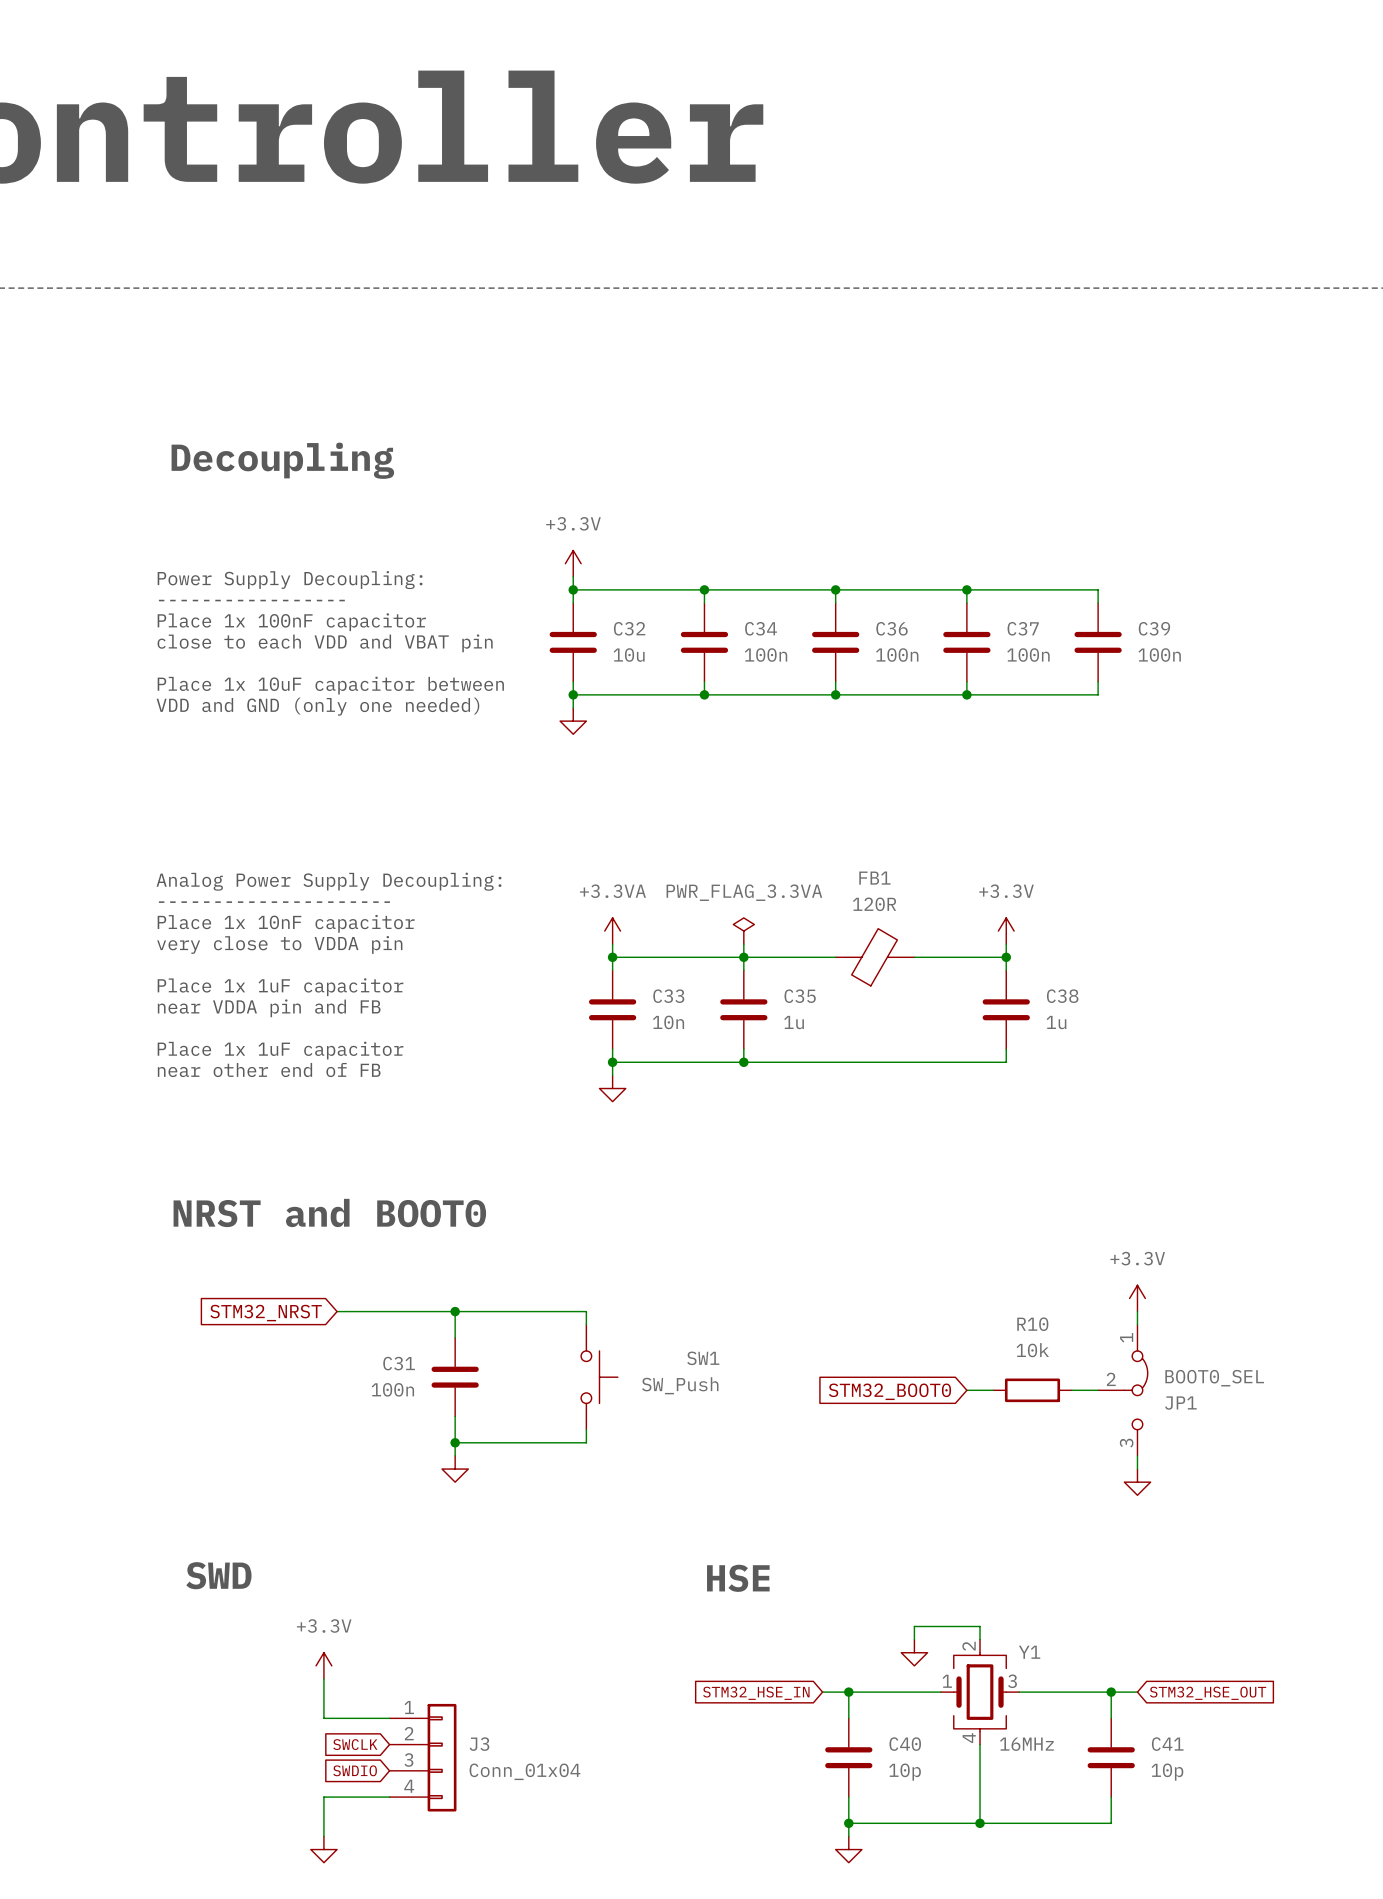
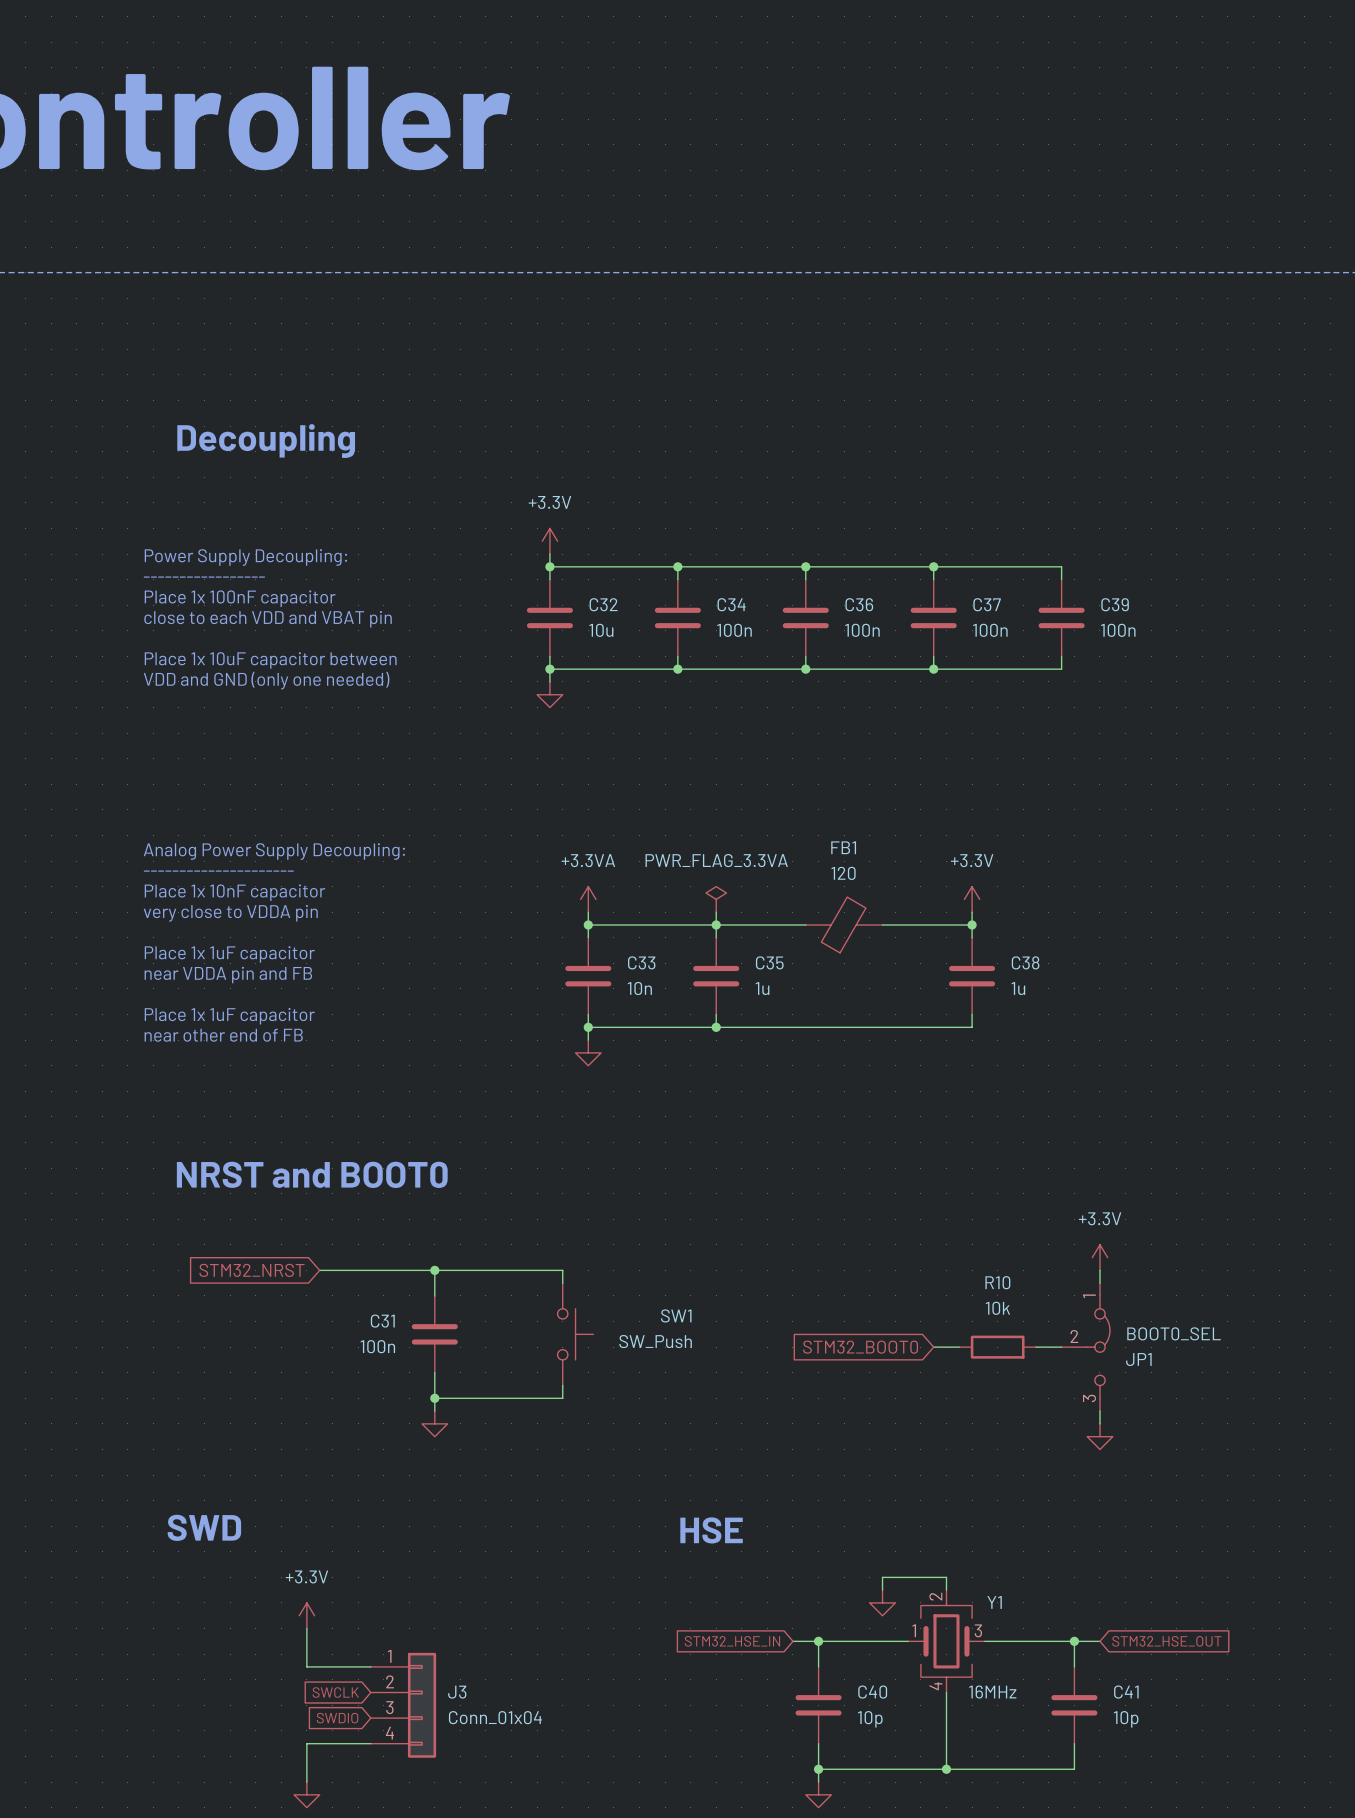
FB1 value: 120R (874, 904) -> 120 (843, 873)

